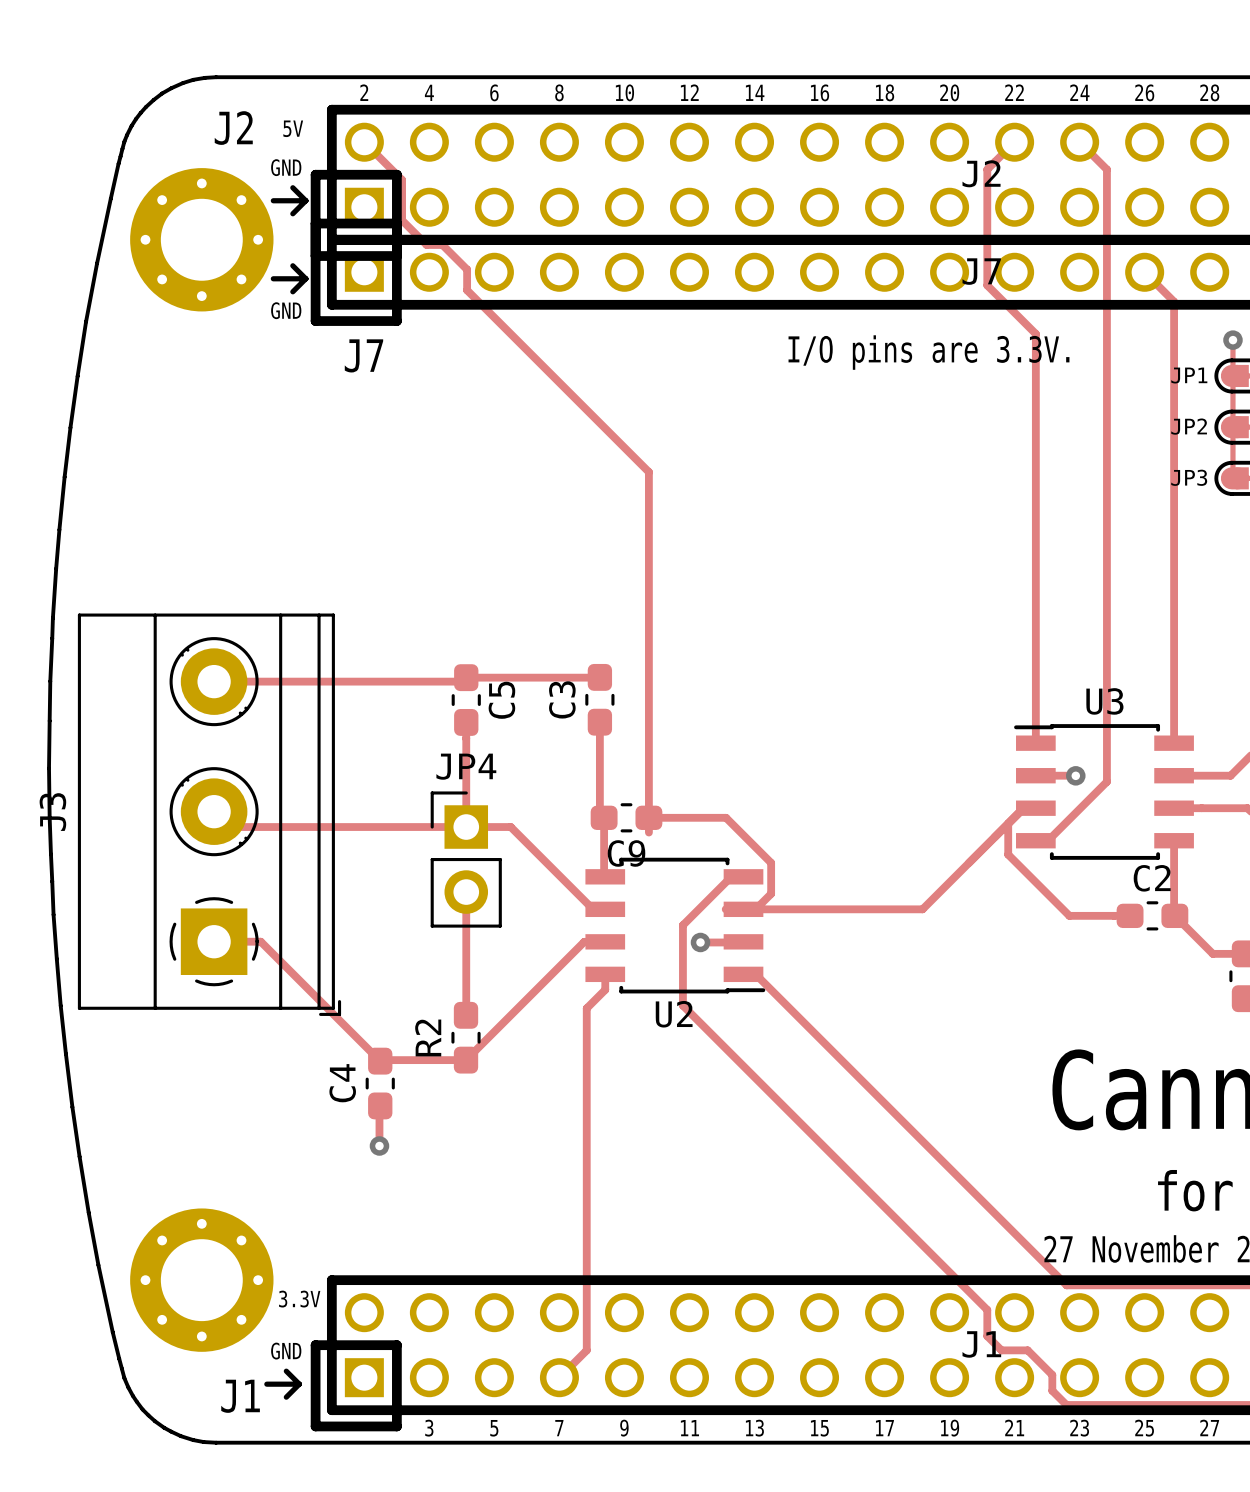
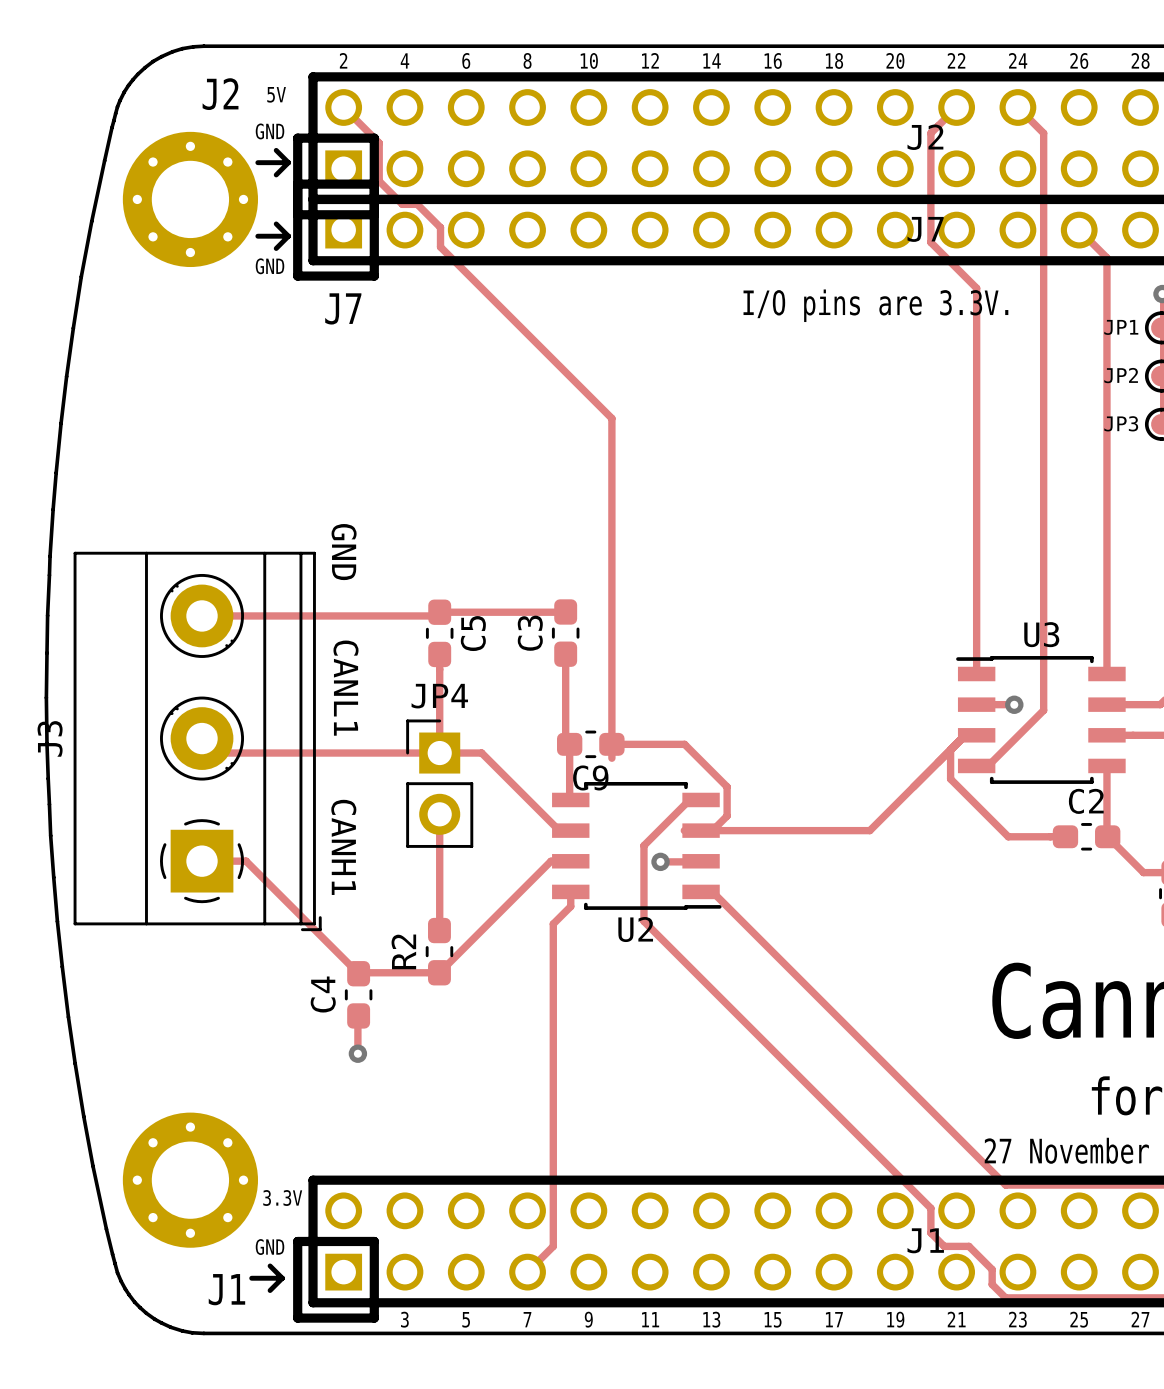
text: none -> GND (344, 552)
text: none -> CANL1 (346, 688)
text: none -> CANH1 (343, 847)

